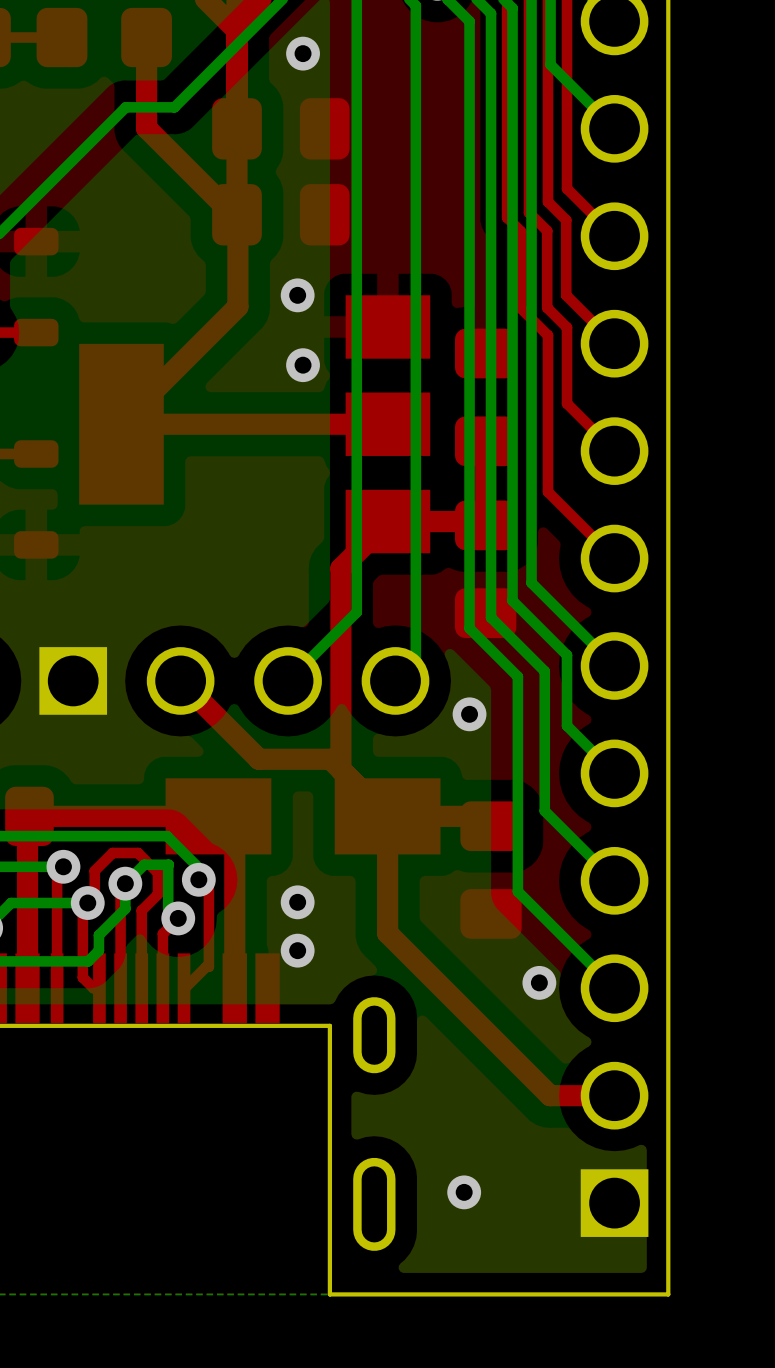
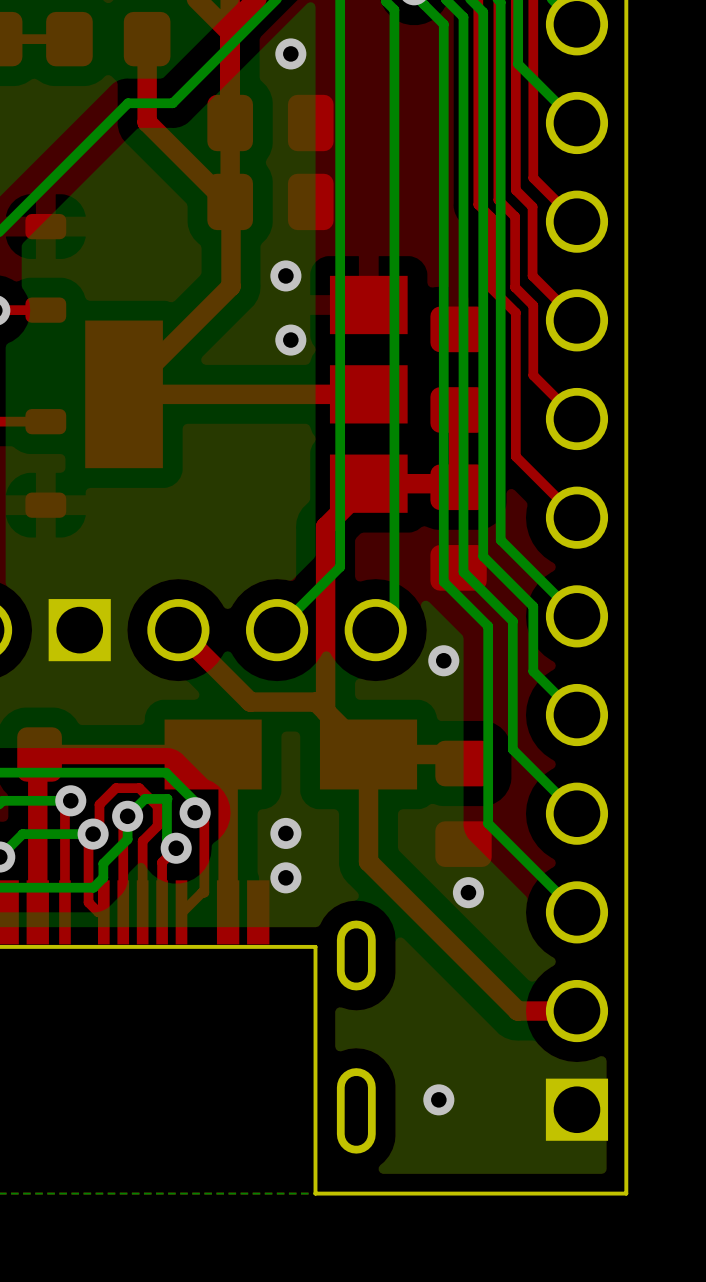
via position: (539, 982) -> (468, 892)

